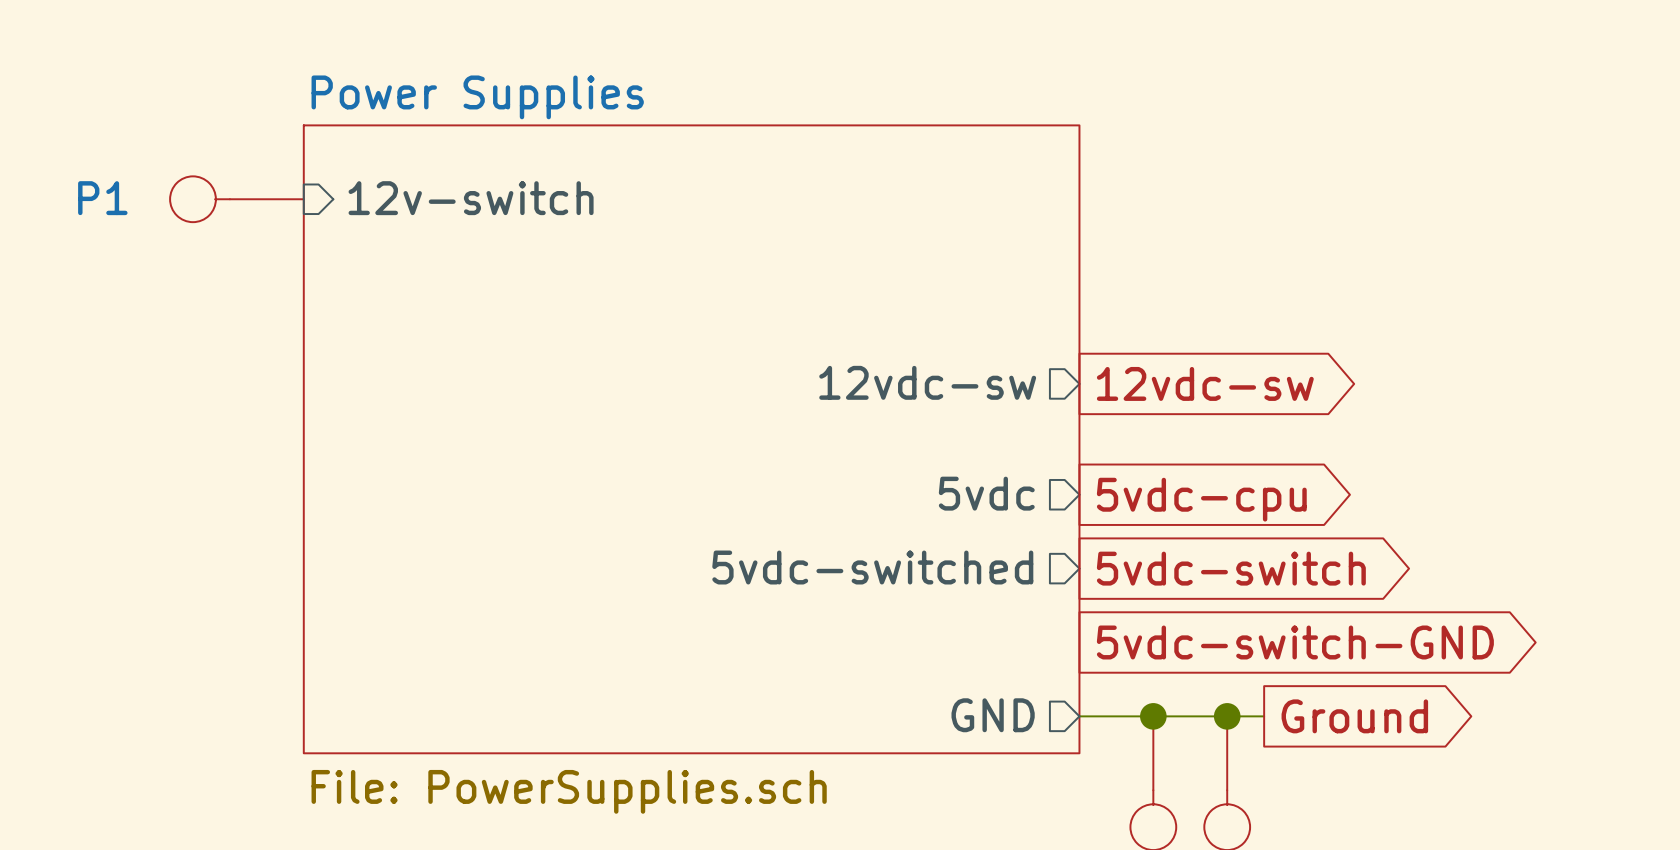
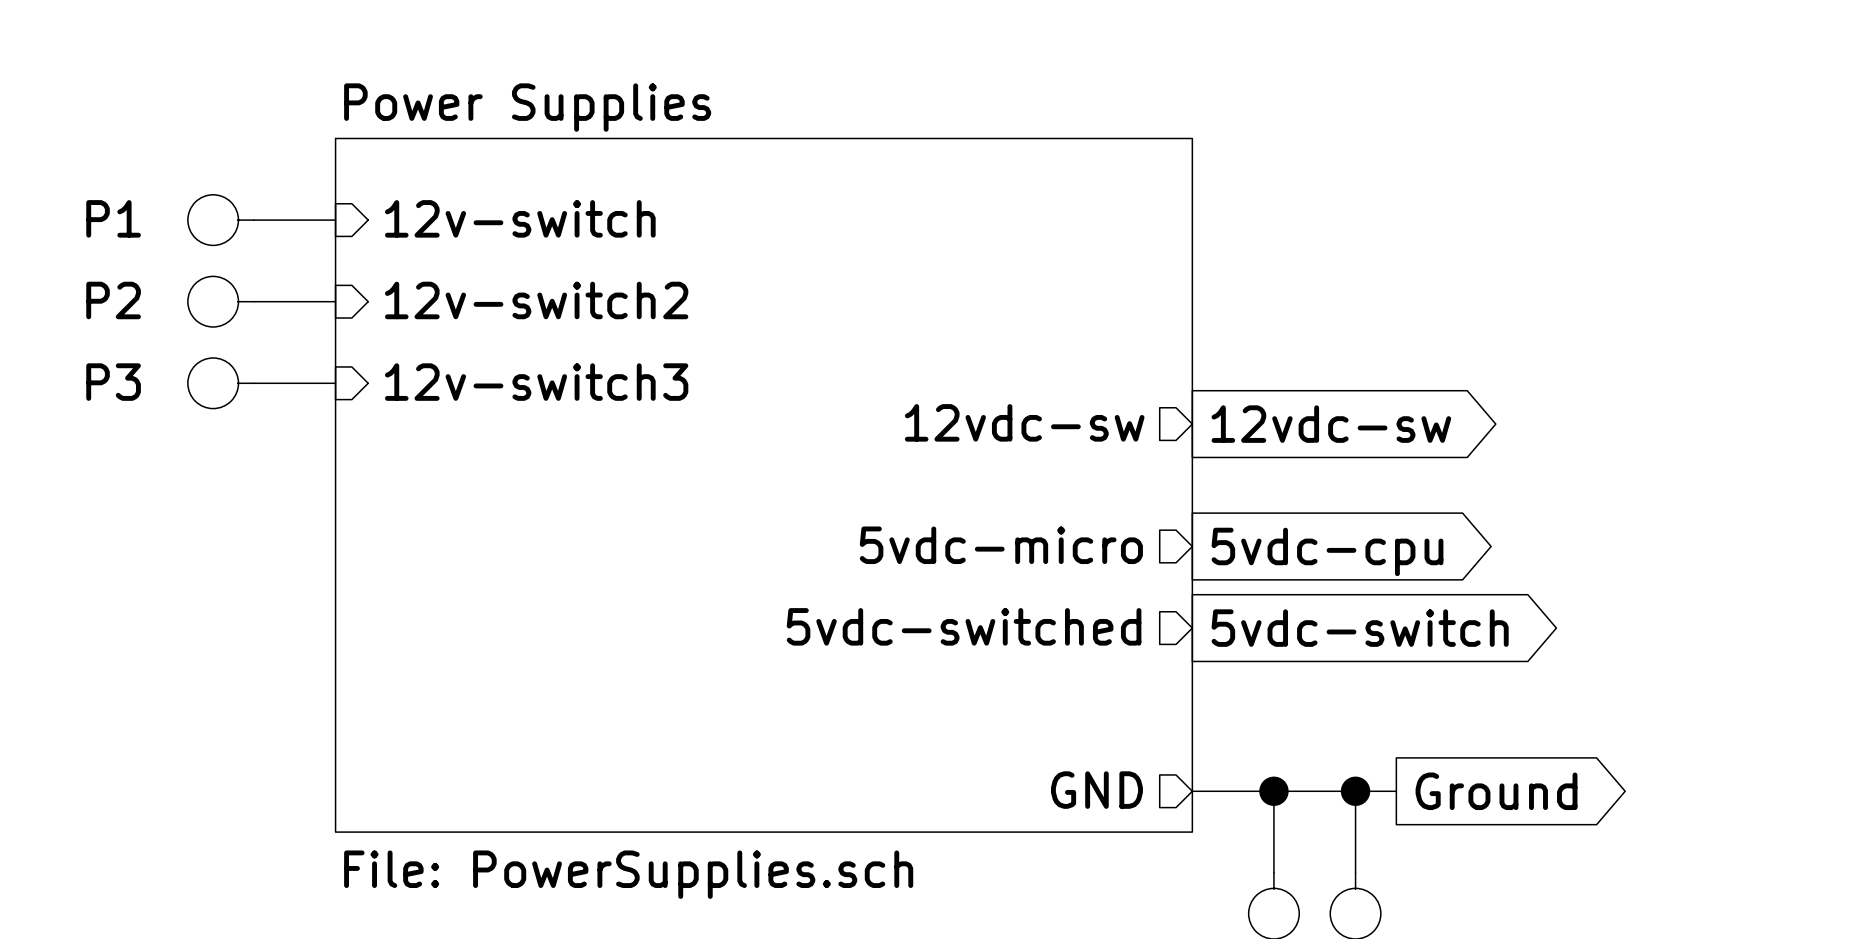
sheet pin: none -> 12v-switch2 (536, 300)
P2: none -> (261, 301)
sheet pin: none -> 12v-switch3 (536, 382)
P3: none -> (261, 383)
sheet pin: 5vdc (986, 493) -> 5vdc-micro (1001, 545)
global label: 5vdc-switch-GND (1295, 642) -> none

